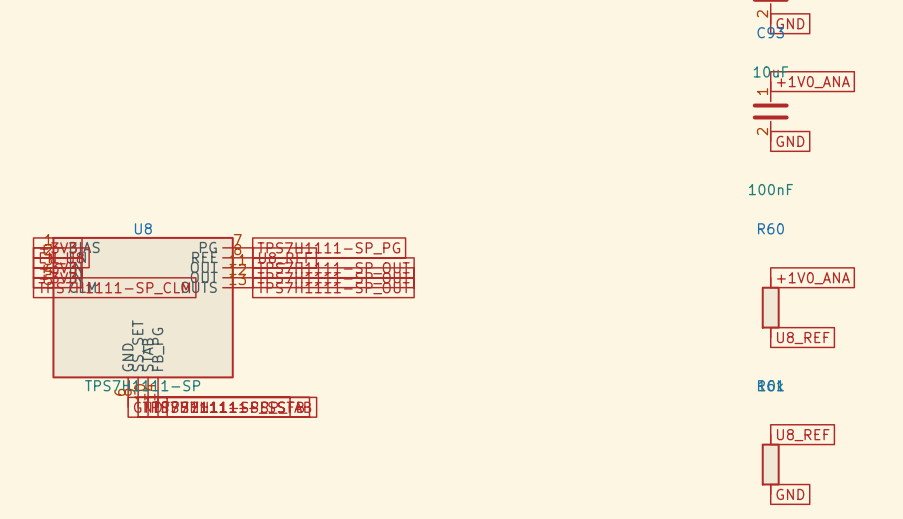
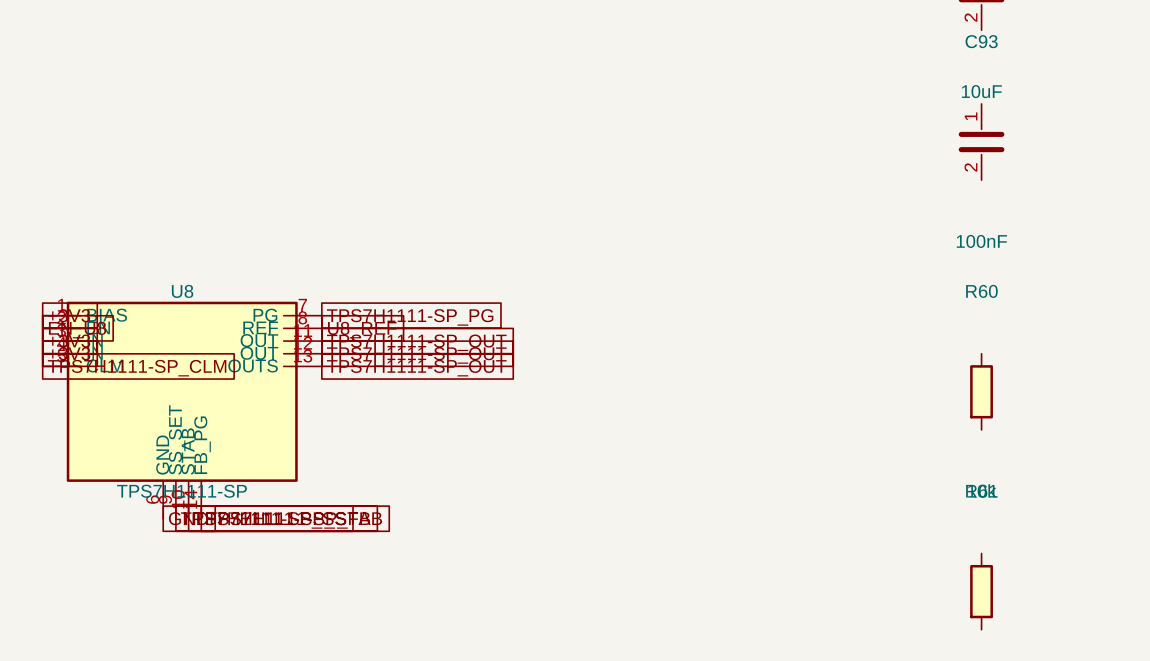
global label: GND (790, 23) -> none
global label: +1V0_ANA (813, 82) -> none
global label: GND (790, 141) -> none
global label: +1V0_ANA (813, 278) -> none
global label: U8_REF (803, 338) -> none
global label: U8_REF (803, 435) -> none
global label: GND (790, 494) -> none

